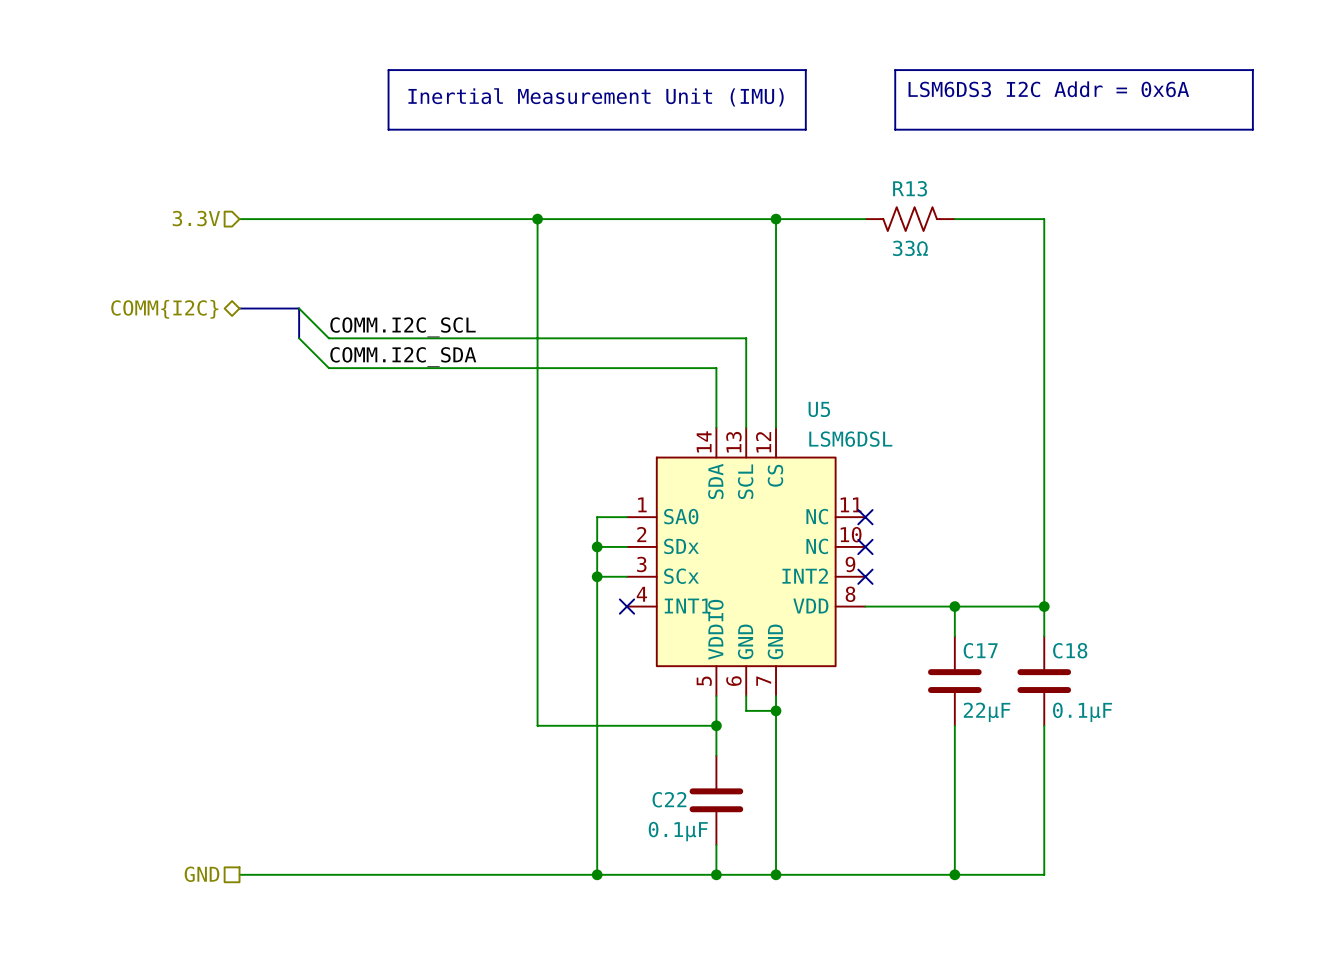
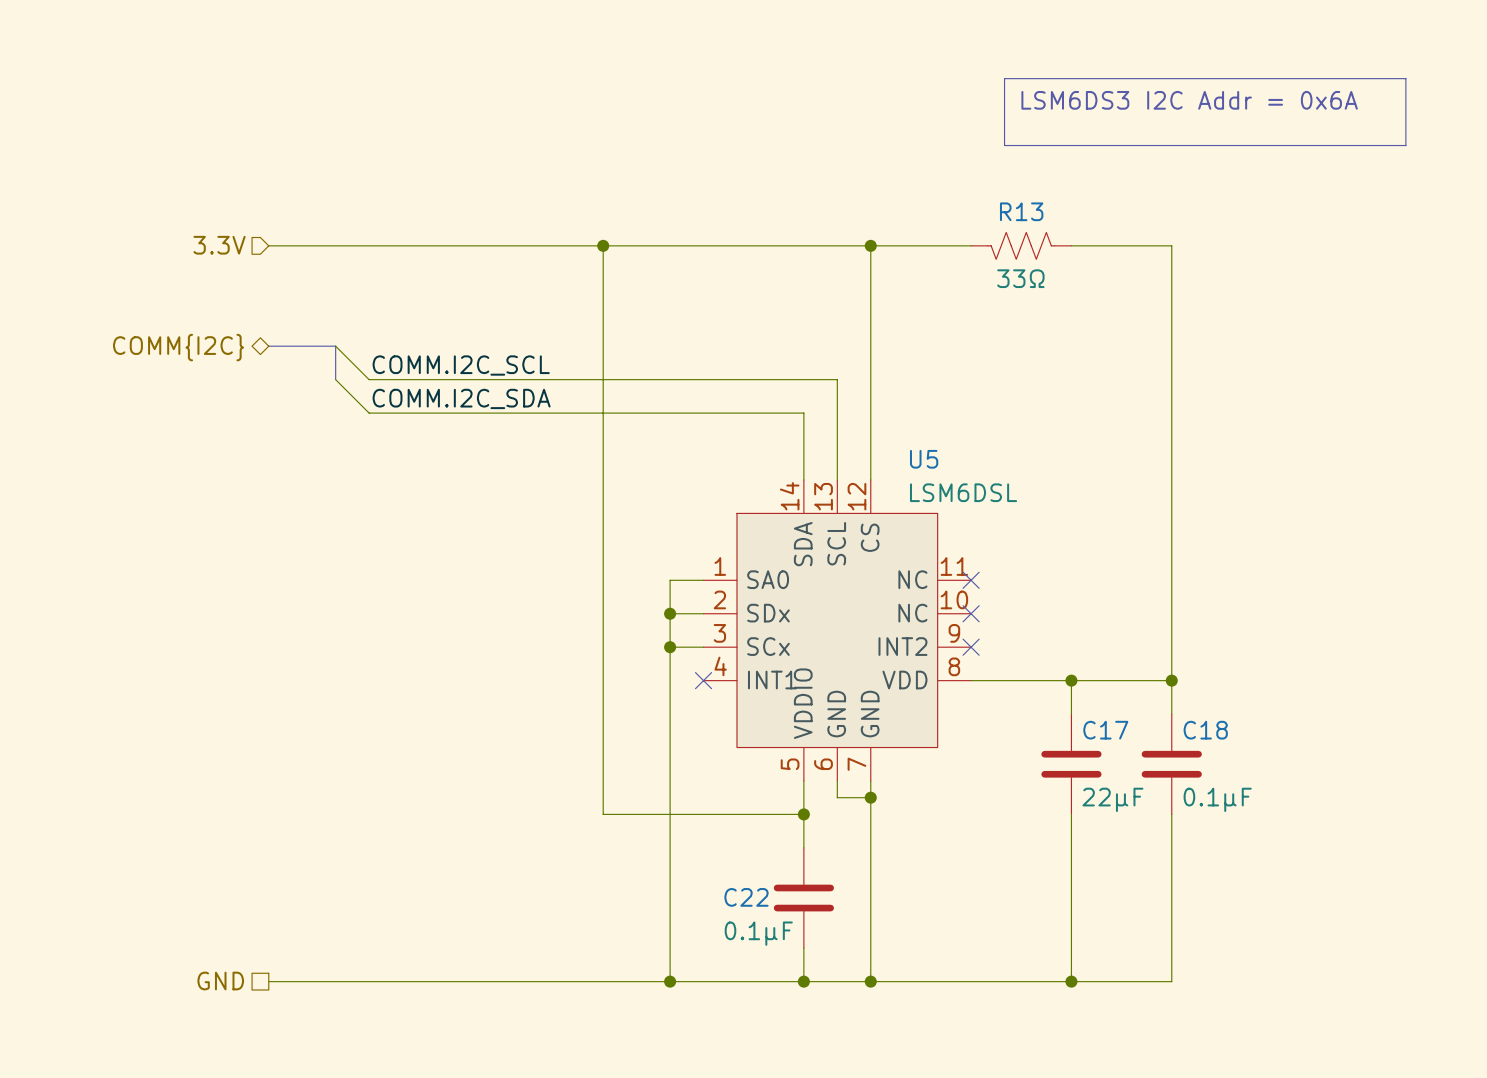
line: (388, 70) (805, 70) (805, 129) (388, 129) (388, 70) -> none
text: Inertial Measurement Unit (IMU) (596, 97) -> none

